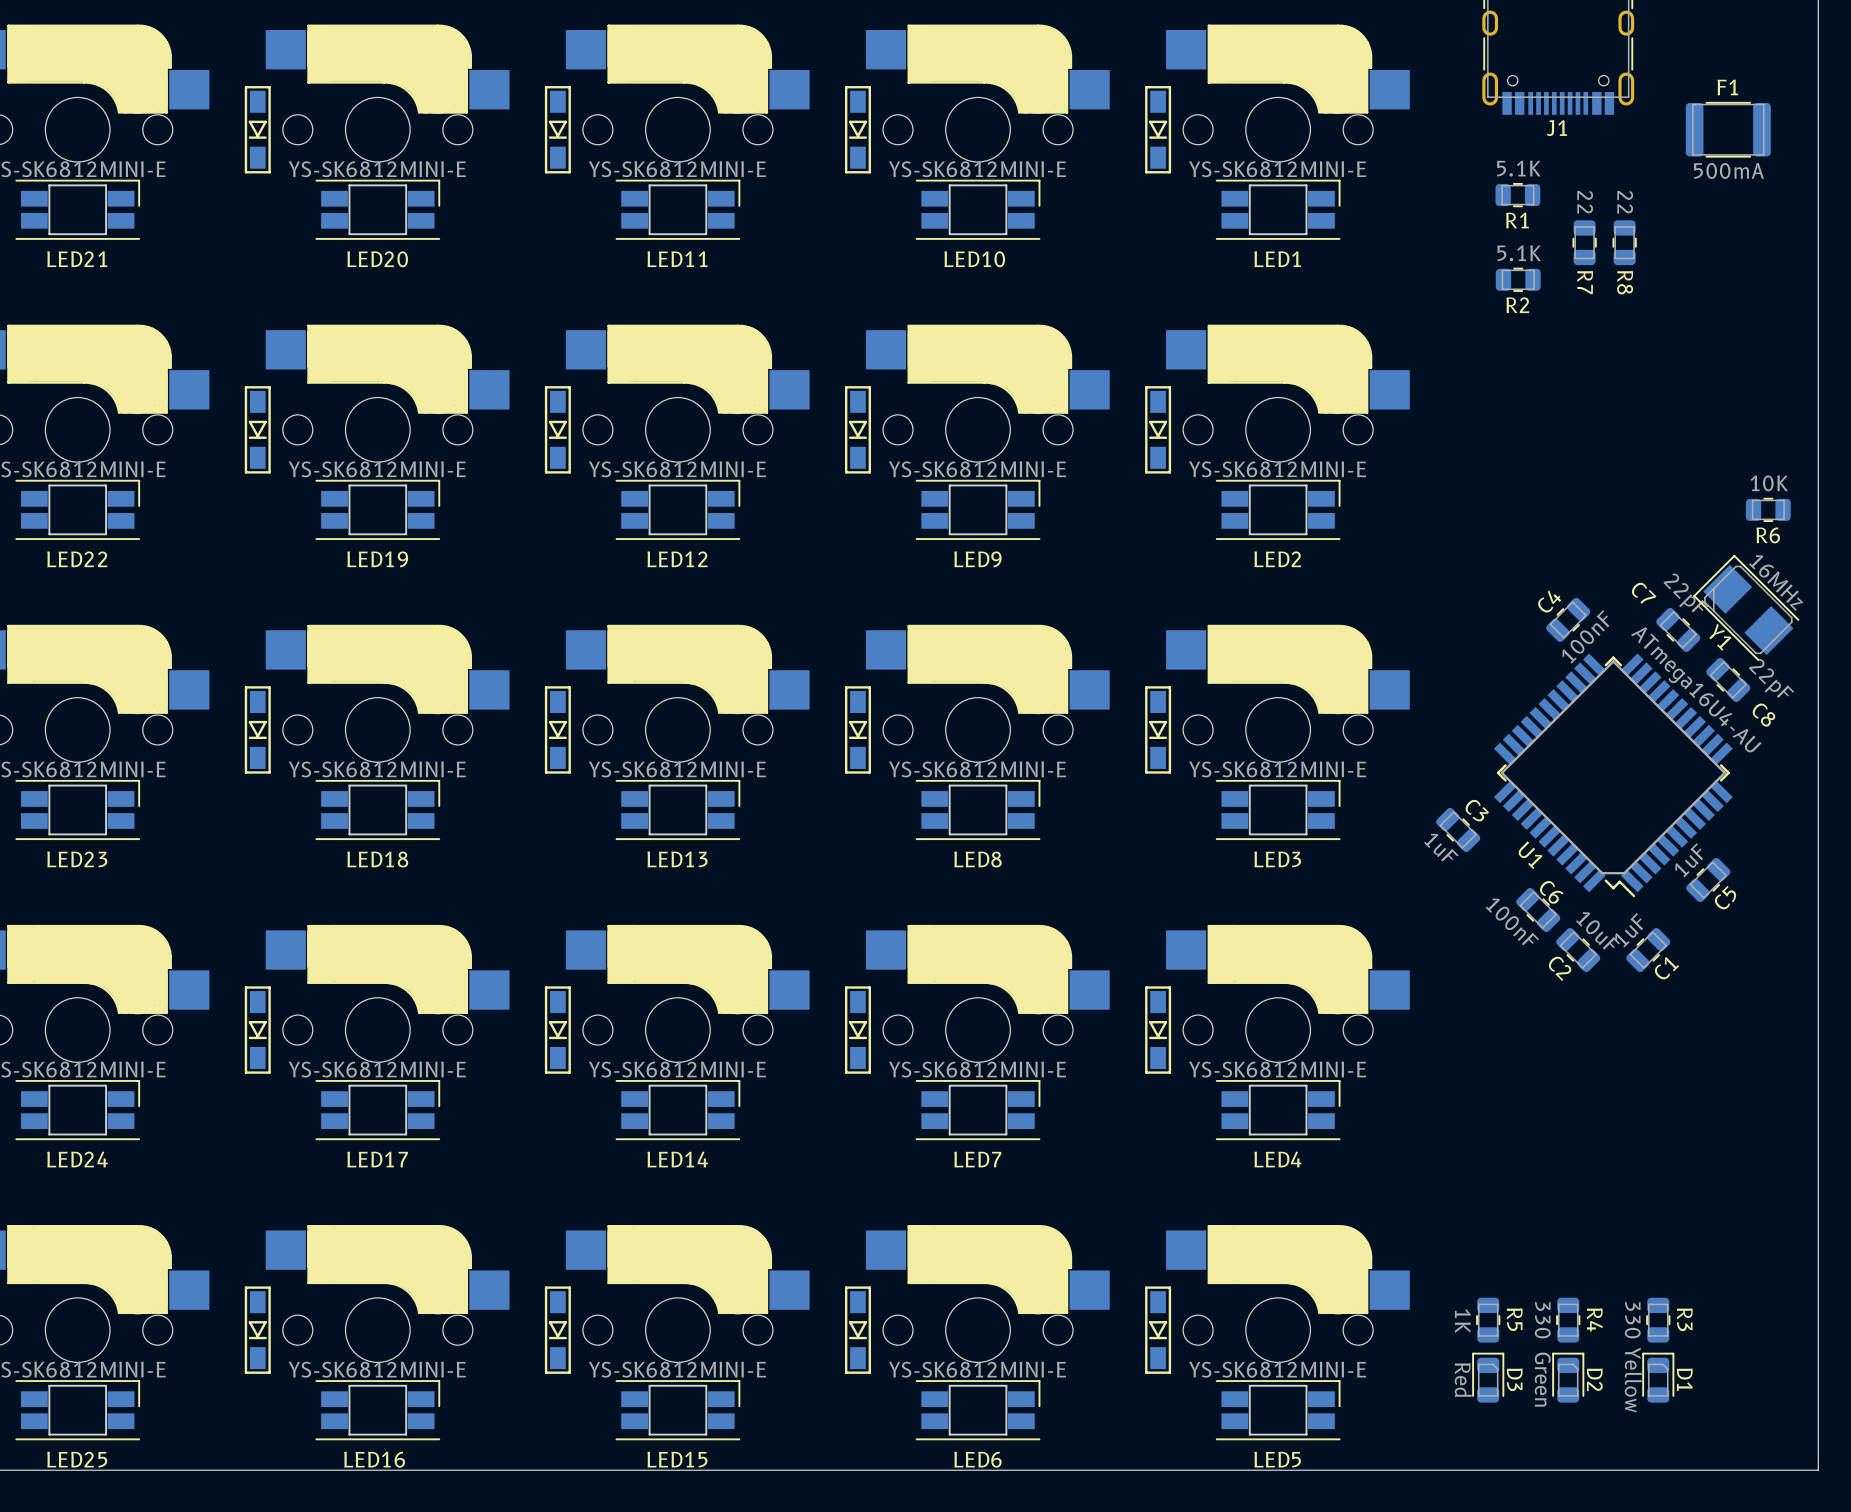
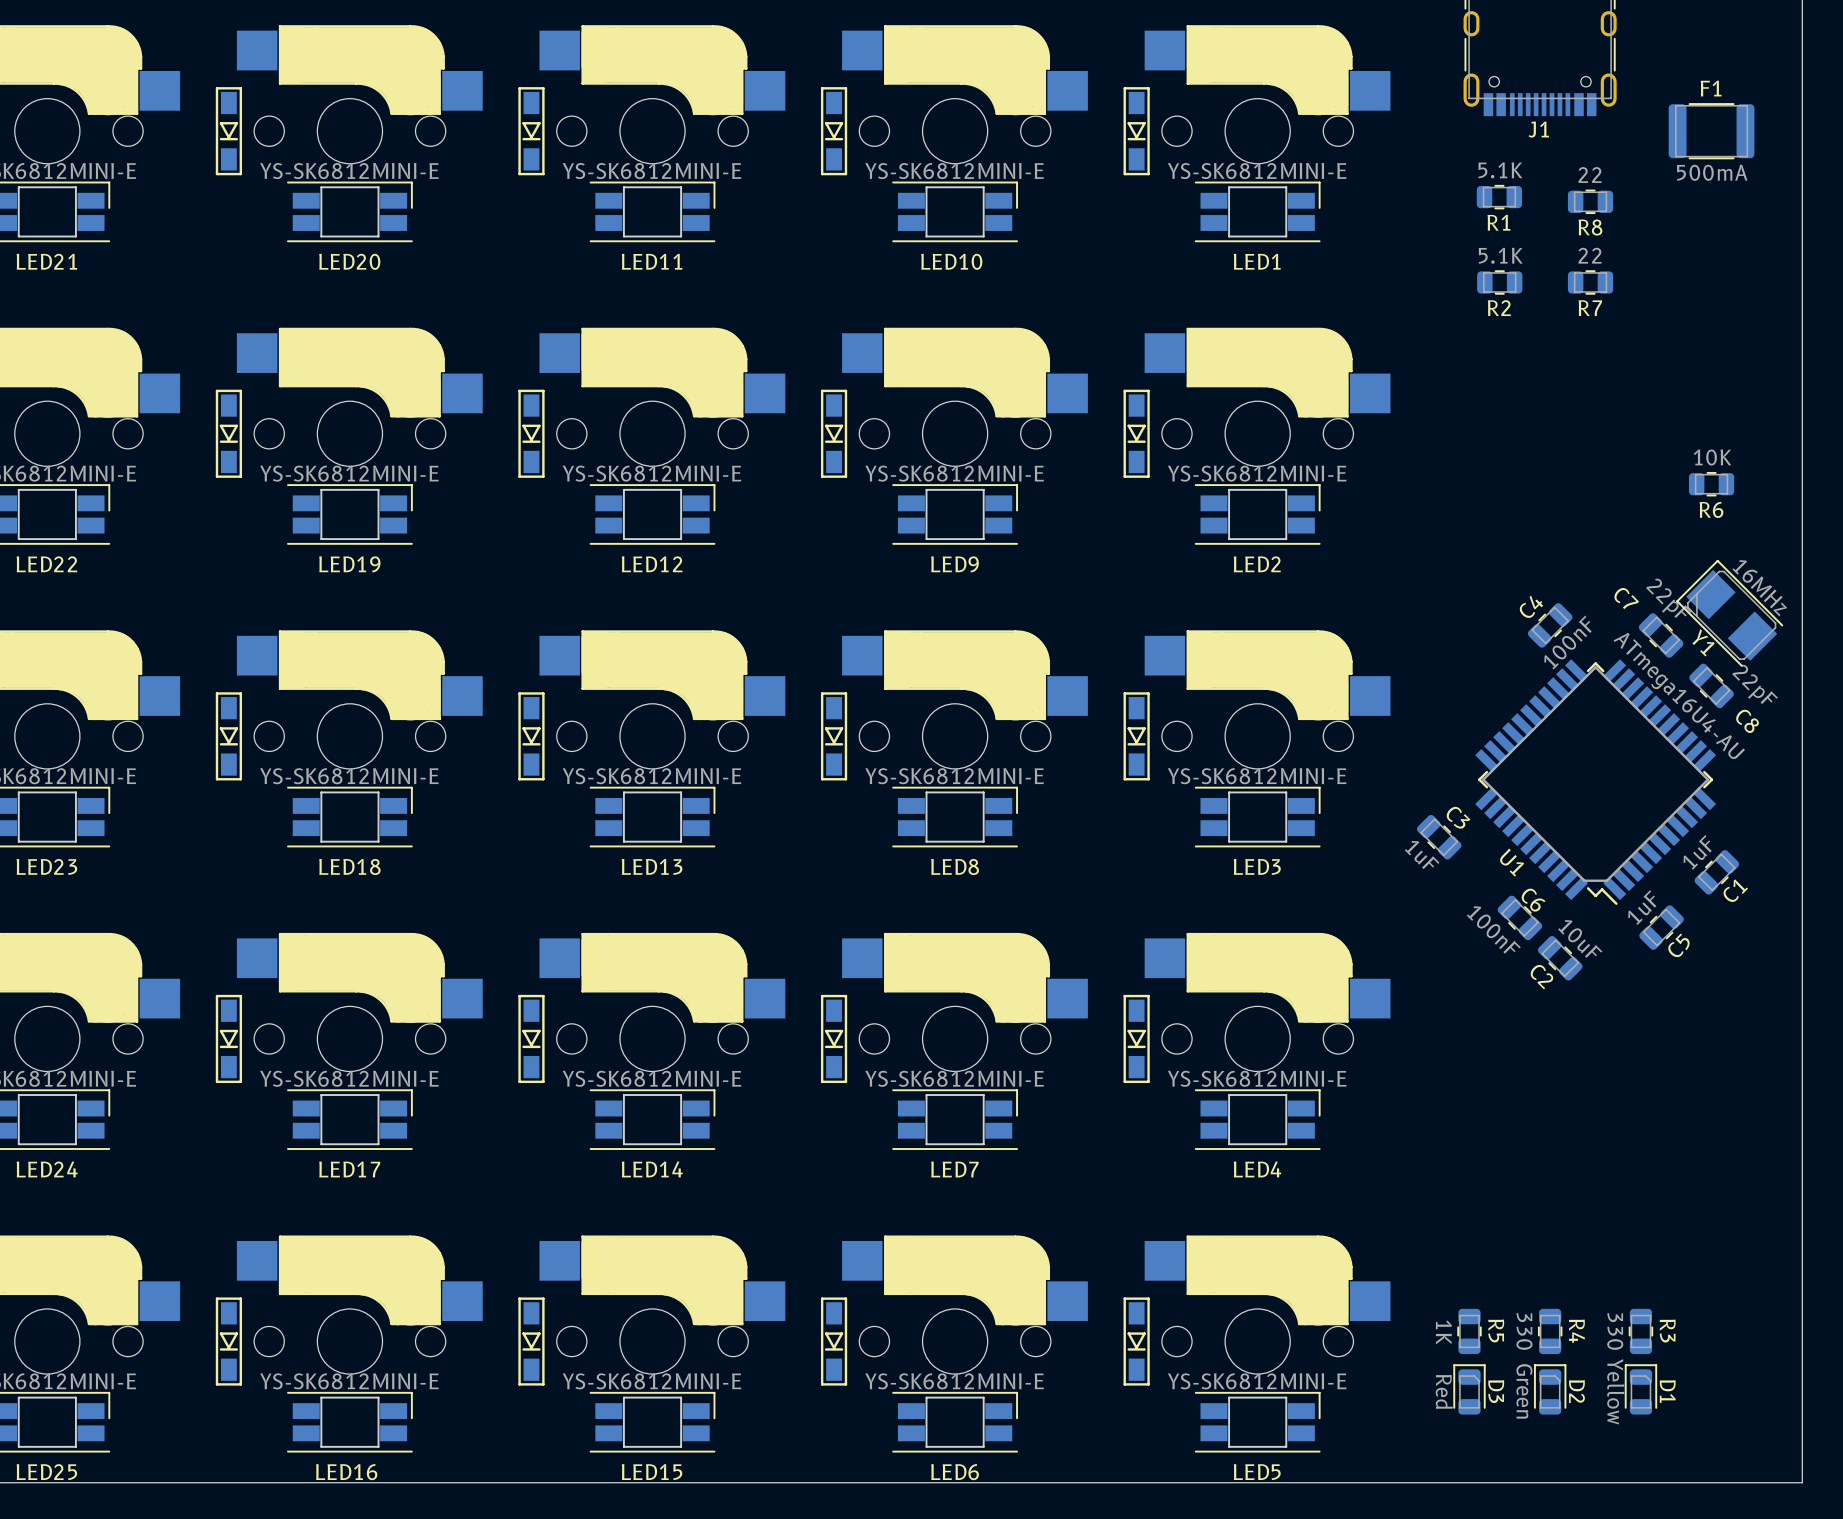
R7 rotation: 0° (1584, 242) -> 90° clockwise (1590, 282)
R7 position: (1584, 242) -> (1590, 282)
R8 rotation: 0° (1624, 242) -> 90° clockwise (1590, 201)
R8 position: (1624, 242) -> (1590, 201)
R6 position: (1768, 509) -> (1711, 484)
C5 position: (1708, 880) -> (1661, 927)
C1 position: (1648, 950) -> (1716, 872)

